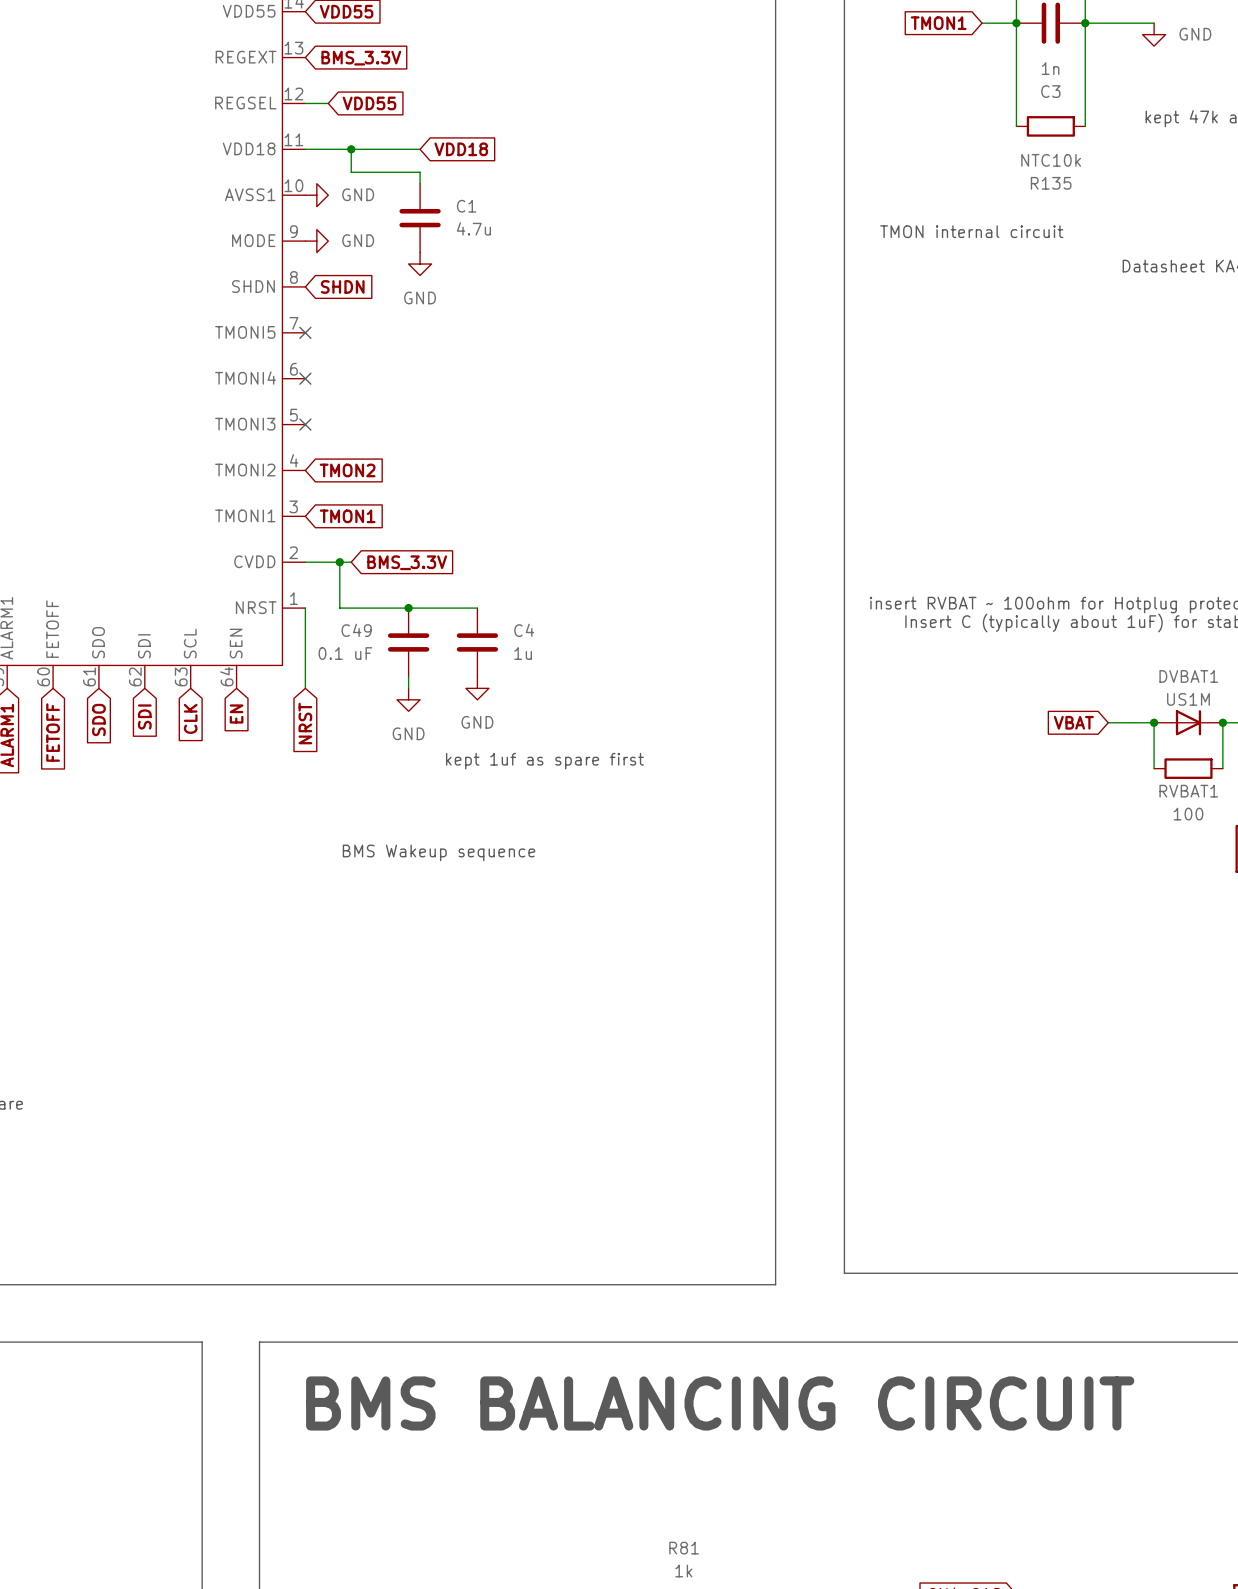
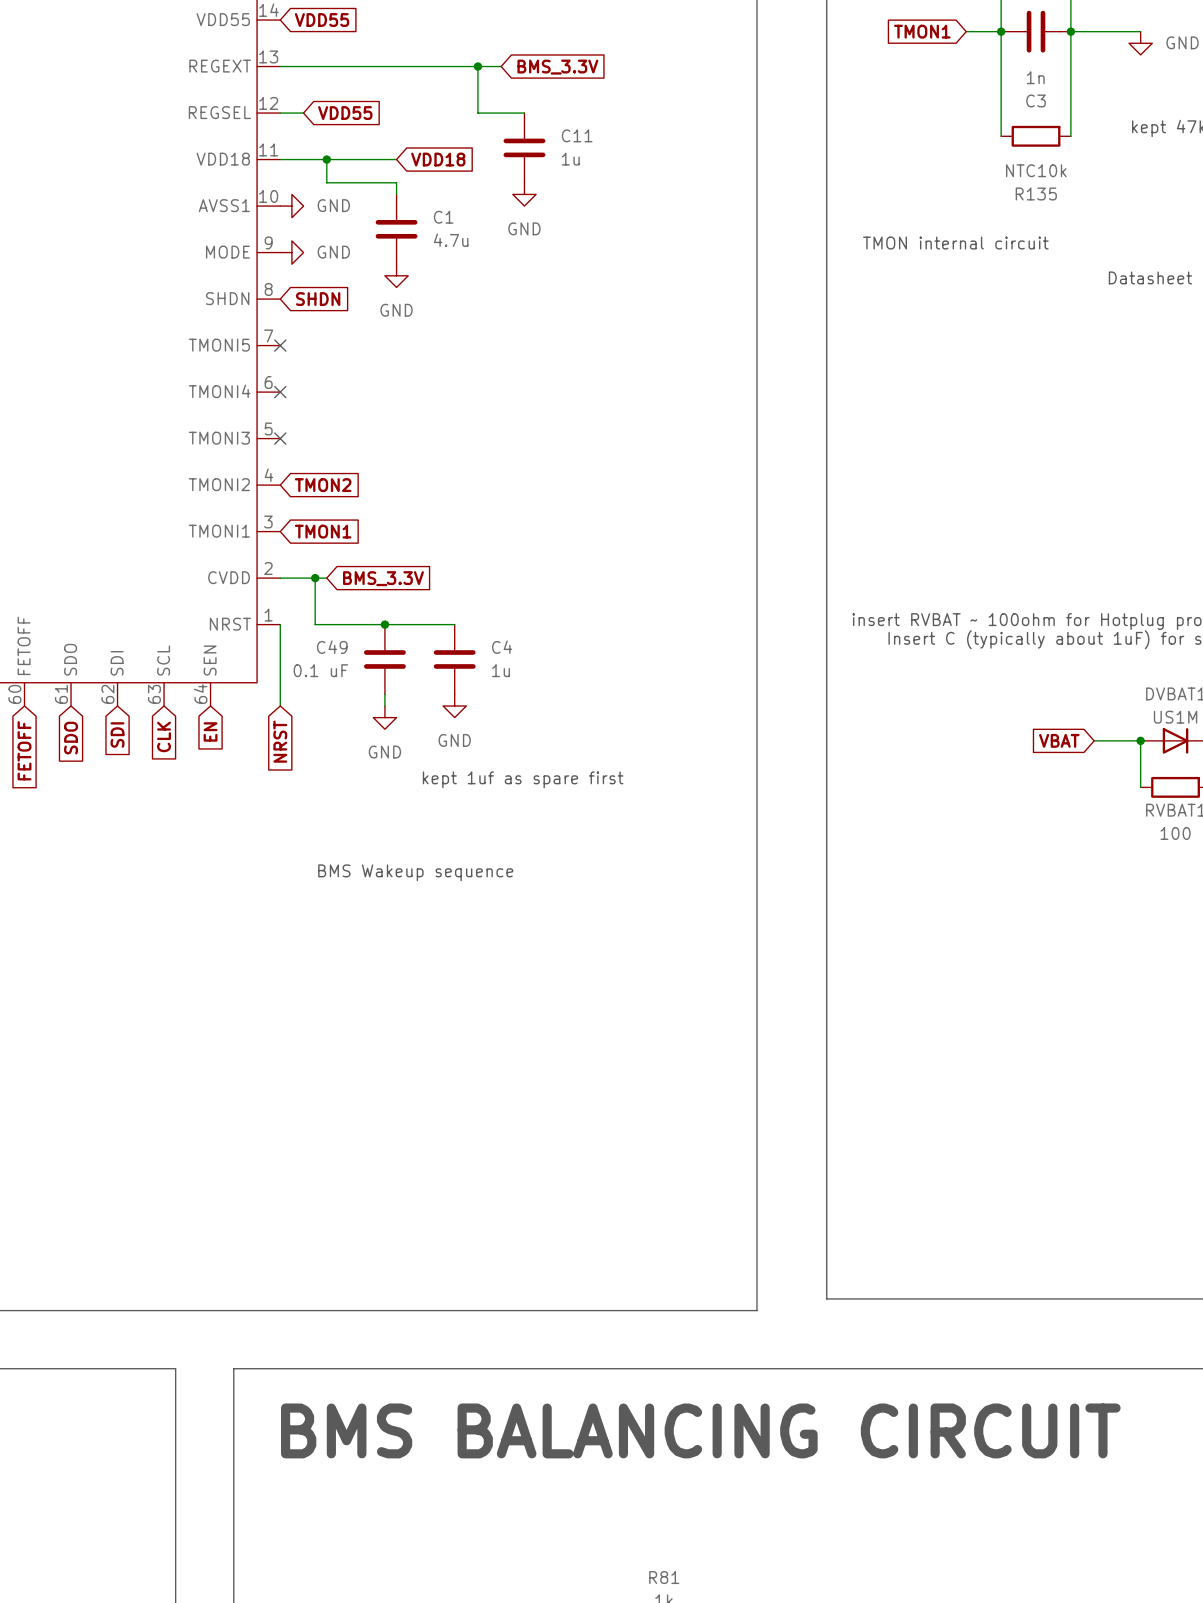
wire: none -> (280, 66) (501, 66)
wire: none -> (477, 66) (477, 113) (524, 113)
junction: none -> (477, 66)
global label position: BMS_3.3V (361, 58) -> BMS_3.3V (557, 67)
C11: none -> 1u (524, 147)
power symbol: none -> GND (524, 194)

